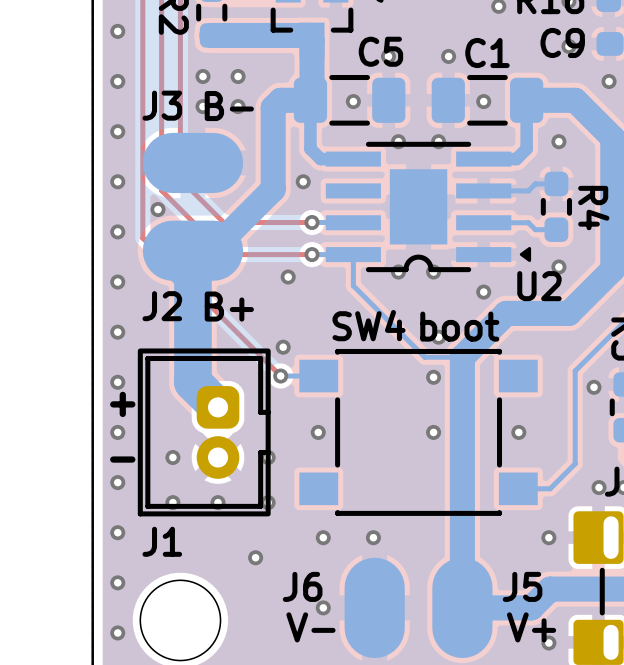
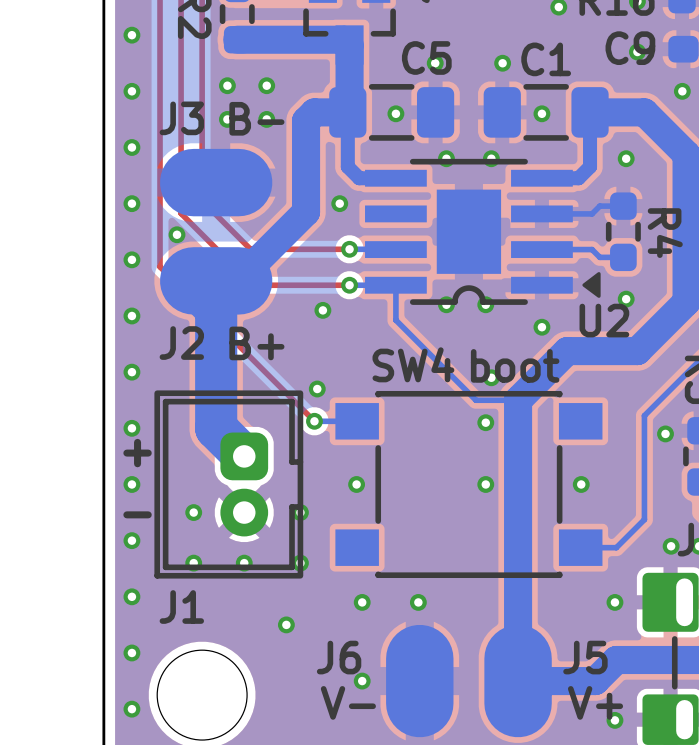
U2 footprint: [325, 141, 532, 273] -> [365, 158, 601, 305]

